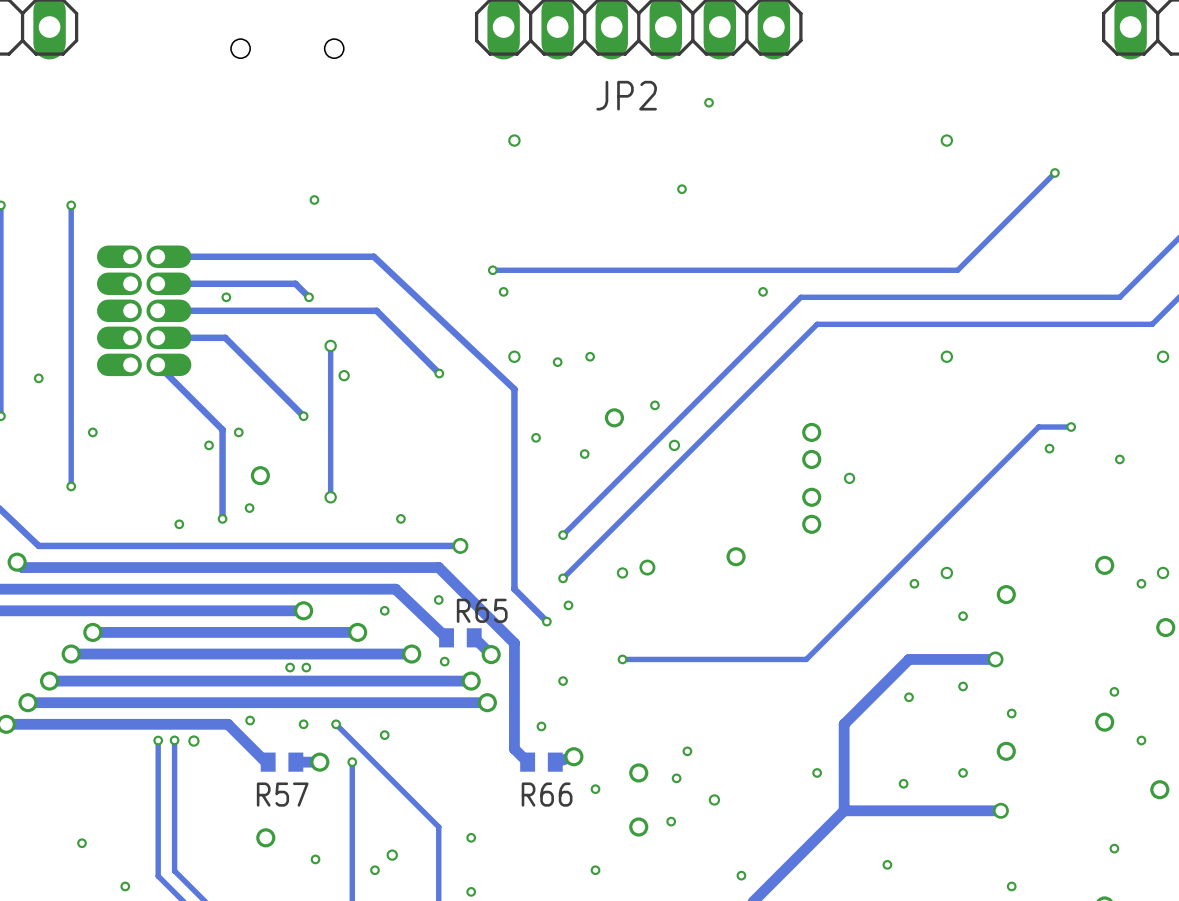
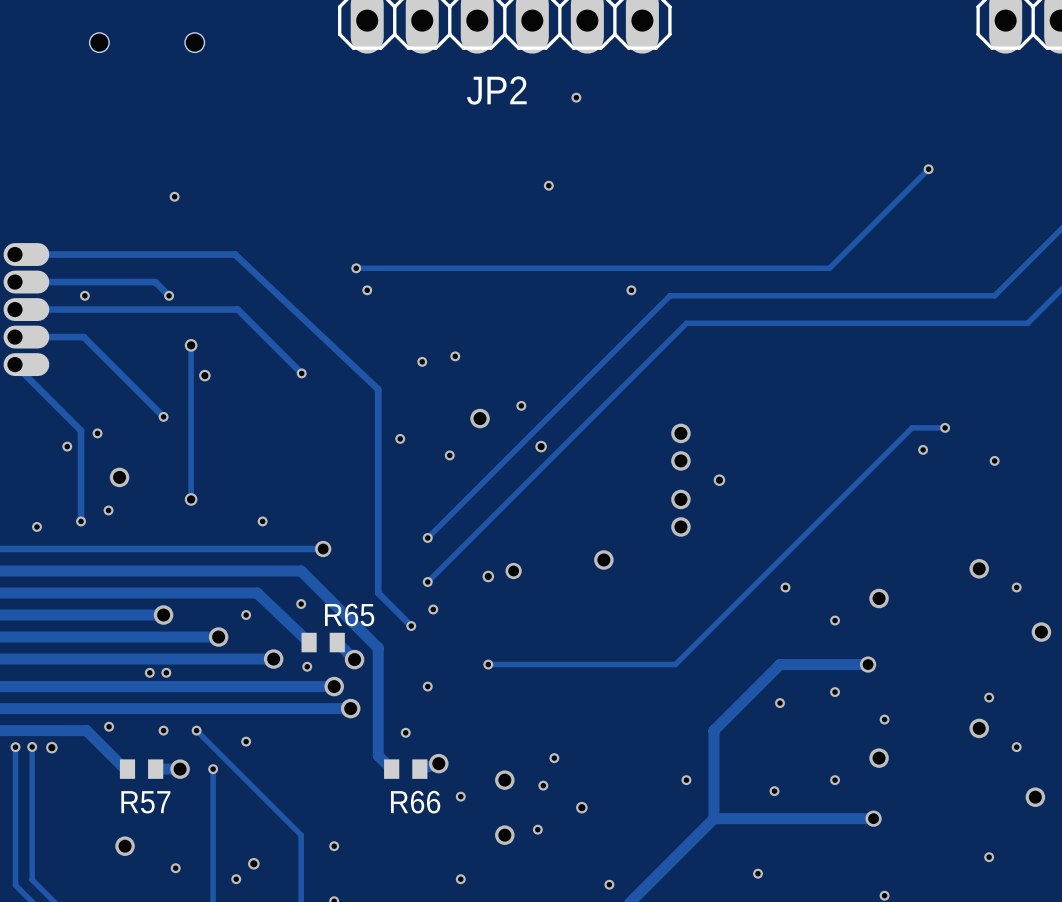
via: (514, 140) -> none
via: (946, 140) -> none
via: (514, 356) -> none
via: (946, 356) -> none
via: (1163, 356) -> none
via: (946, 572) -> none
via: (1163, 572) -> none

